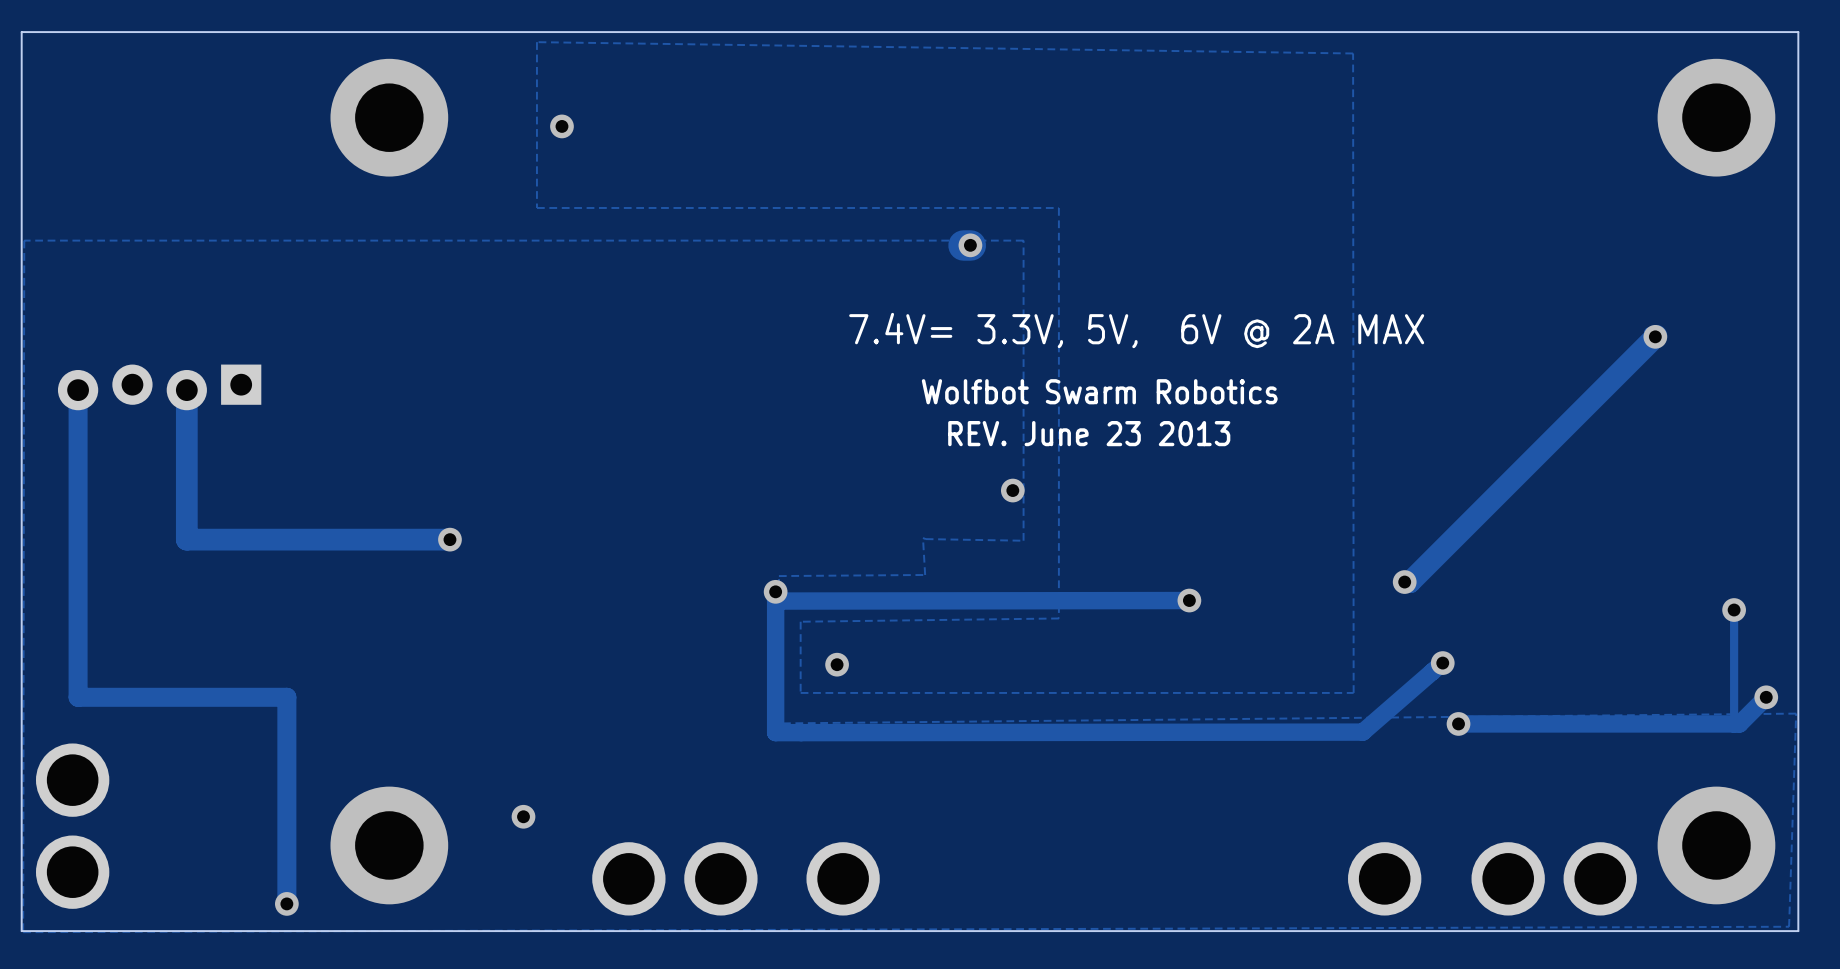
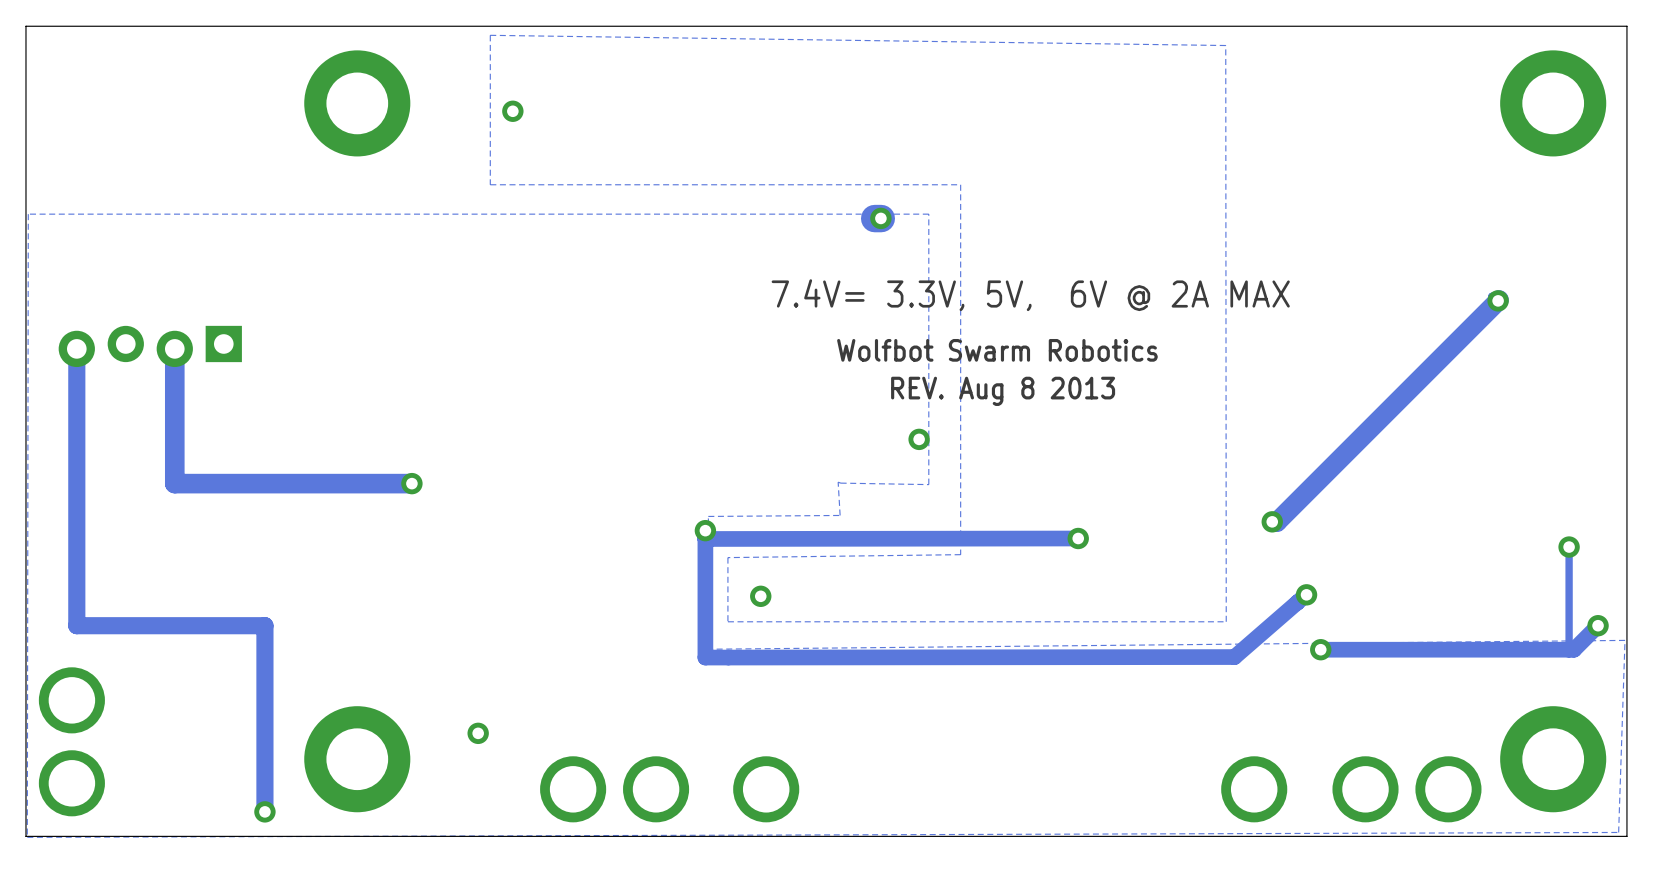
text: REV. June 23 2013 (1089, 433) -> REV. Aug 8 2013 (1003, 391)

